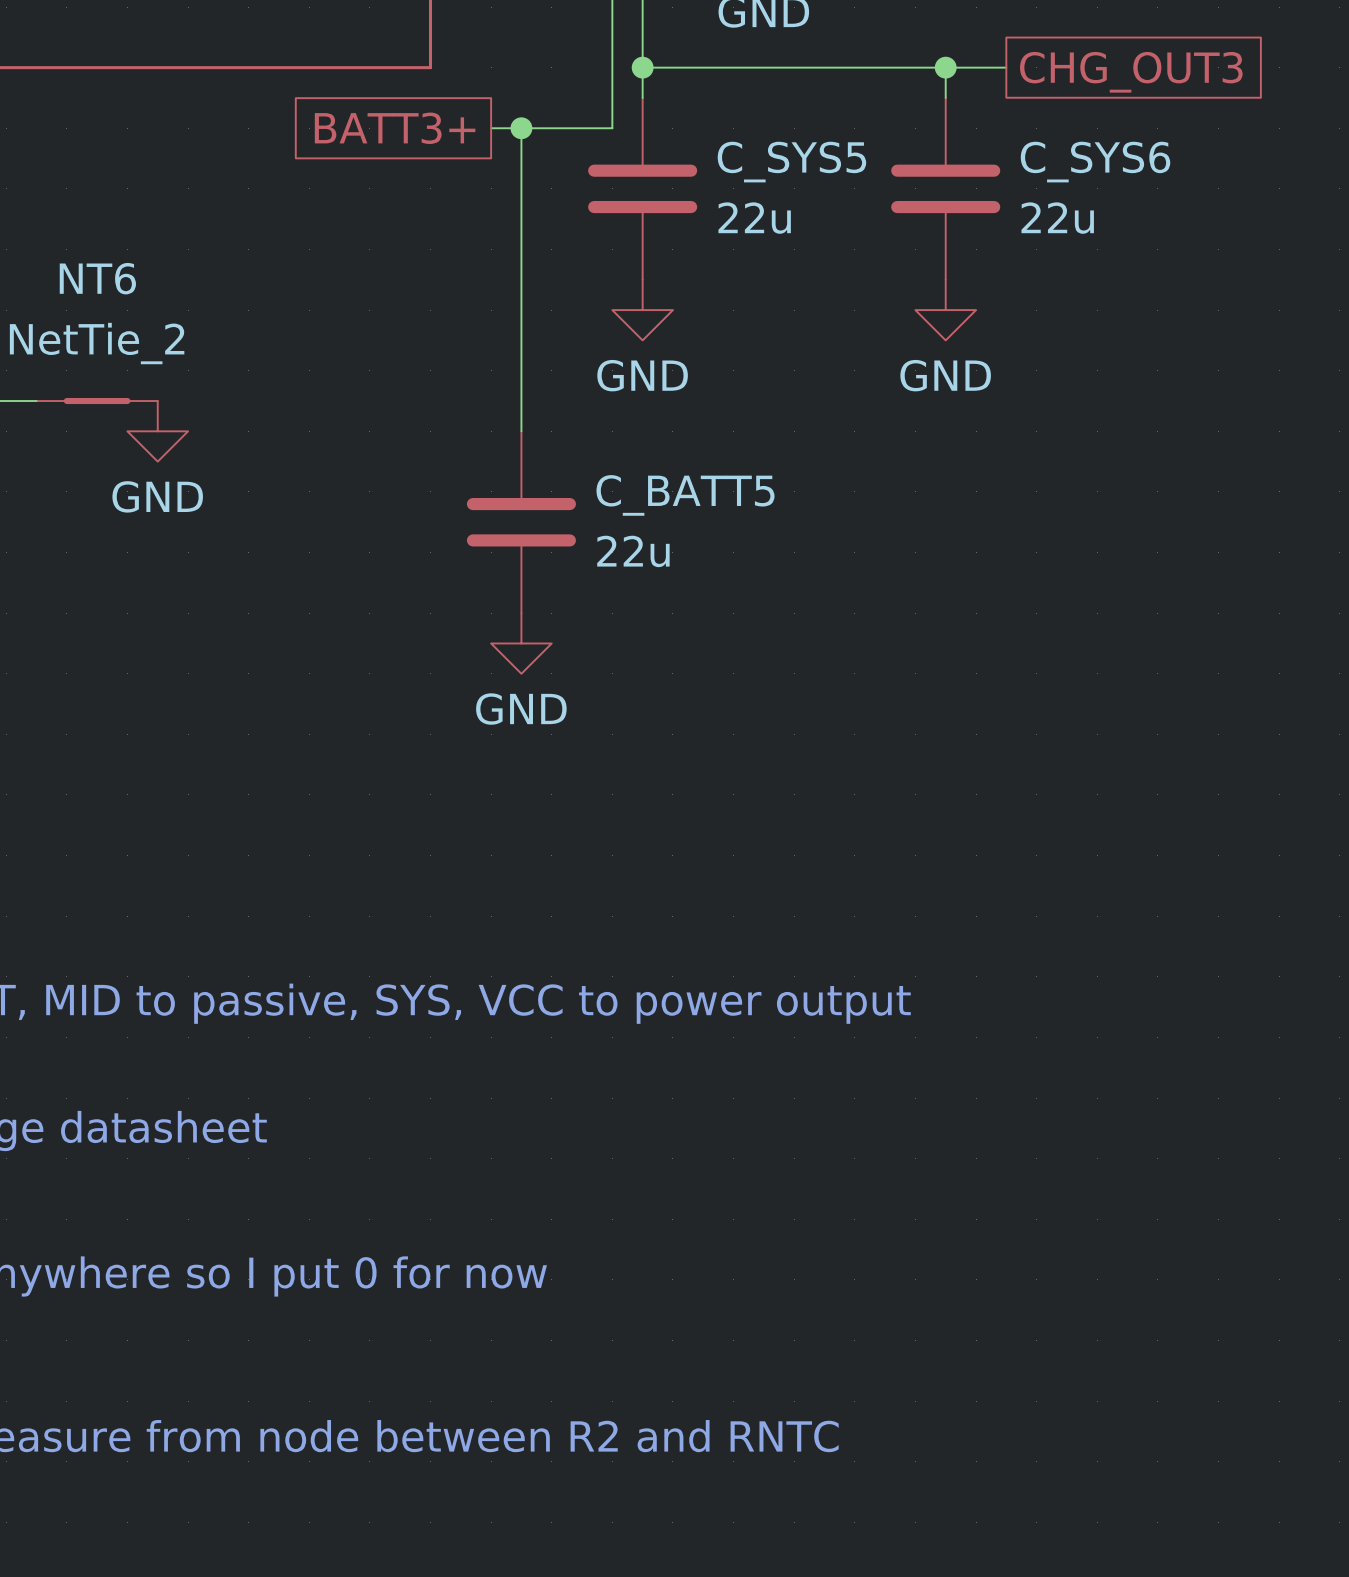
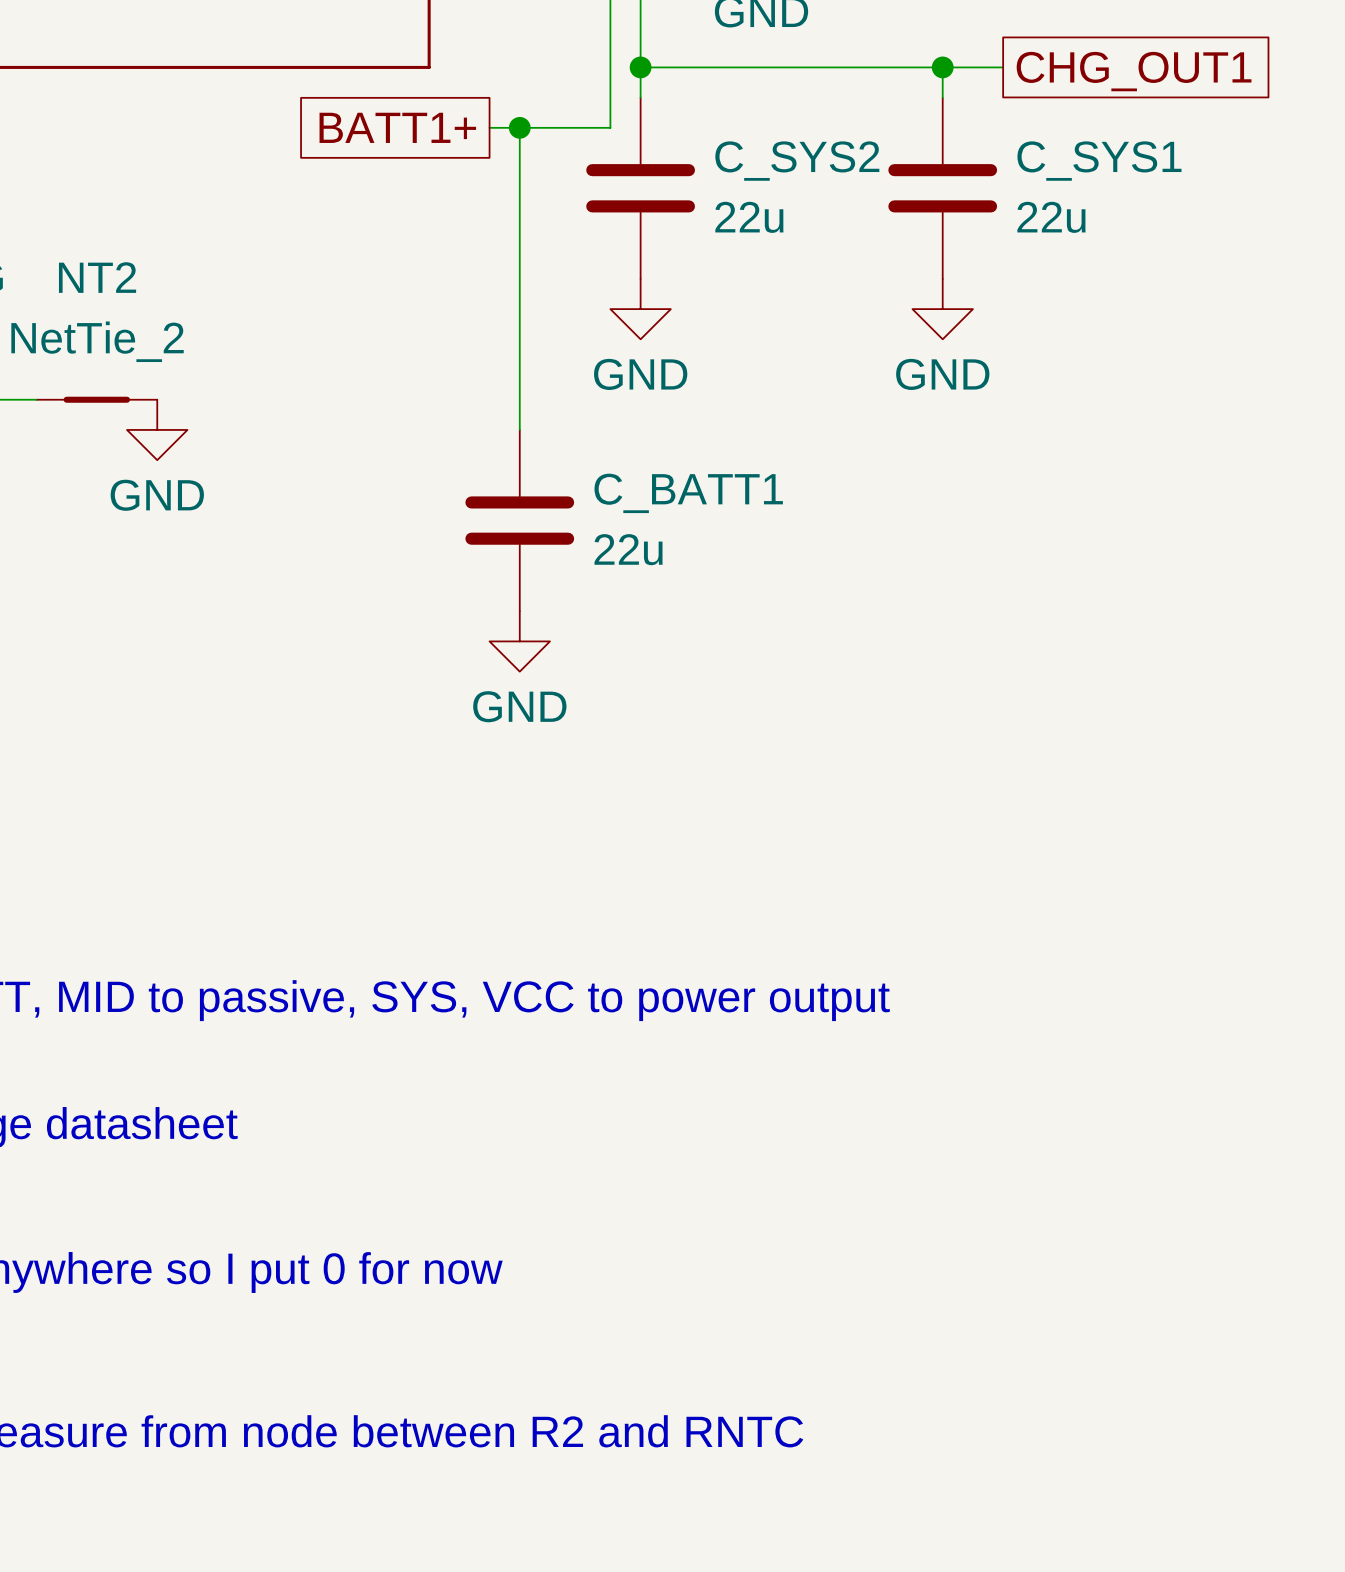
global label: CHG_OUT3 (1131, 72) -> CHG_OUT1 (1134, 71)
global label: BATT3+ (395, 128) -> BATT1+ (397, 127)
C_SYS5 name: C_SYS5 (791, 162) -> C_SYS2 (797, 161)
C_SYS6 name: C_SYS6 (1095, 162) -> C_SYS1 (1099, 161)
NT6 name: NT6 (97, 278) -> NT2 (97, 277)
C_BATT5 name: C_BATT5 (685, 495) -> C_BATT1 (688, 493)

